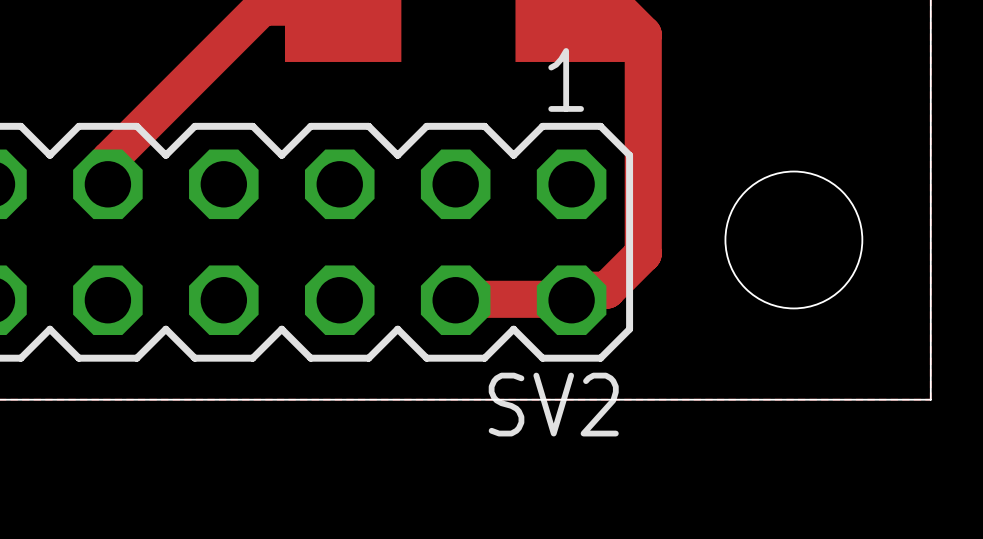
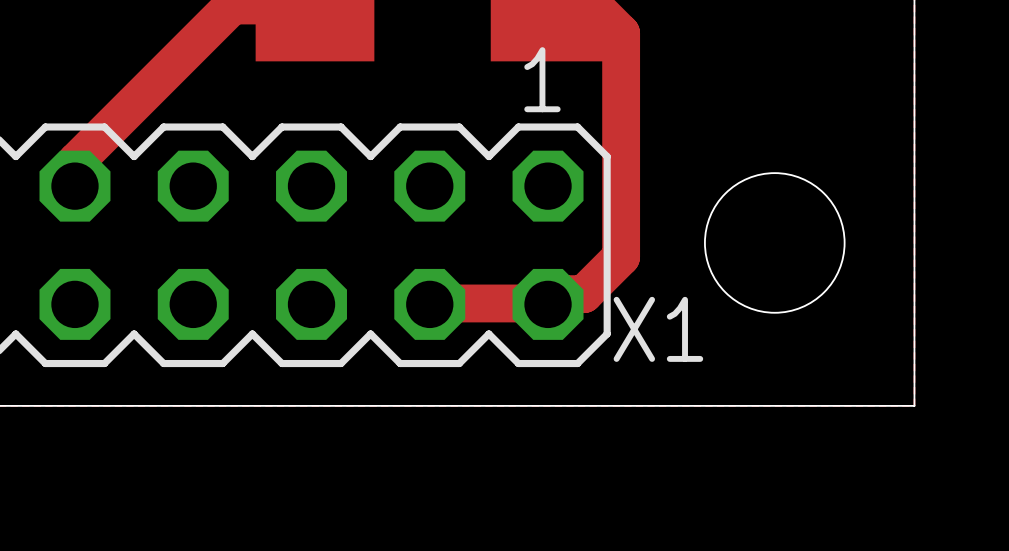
SV2 name: SV2 (553, 404) -> X1 (658, 329)

